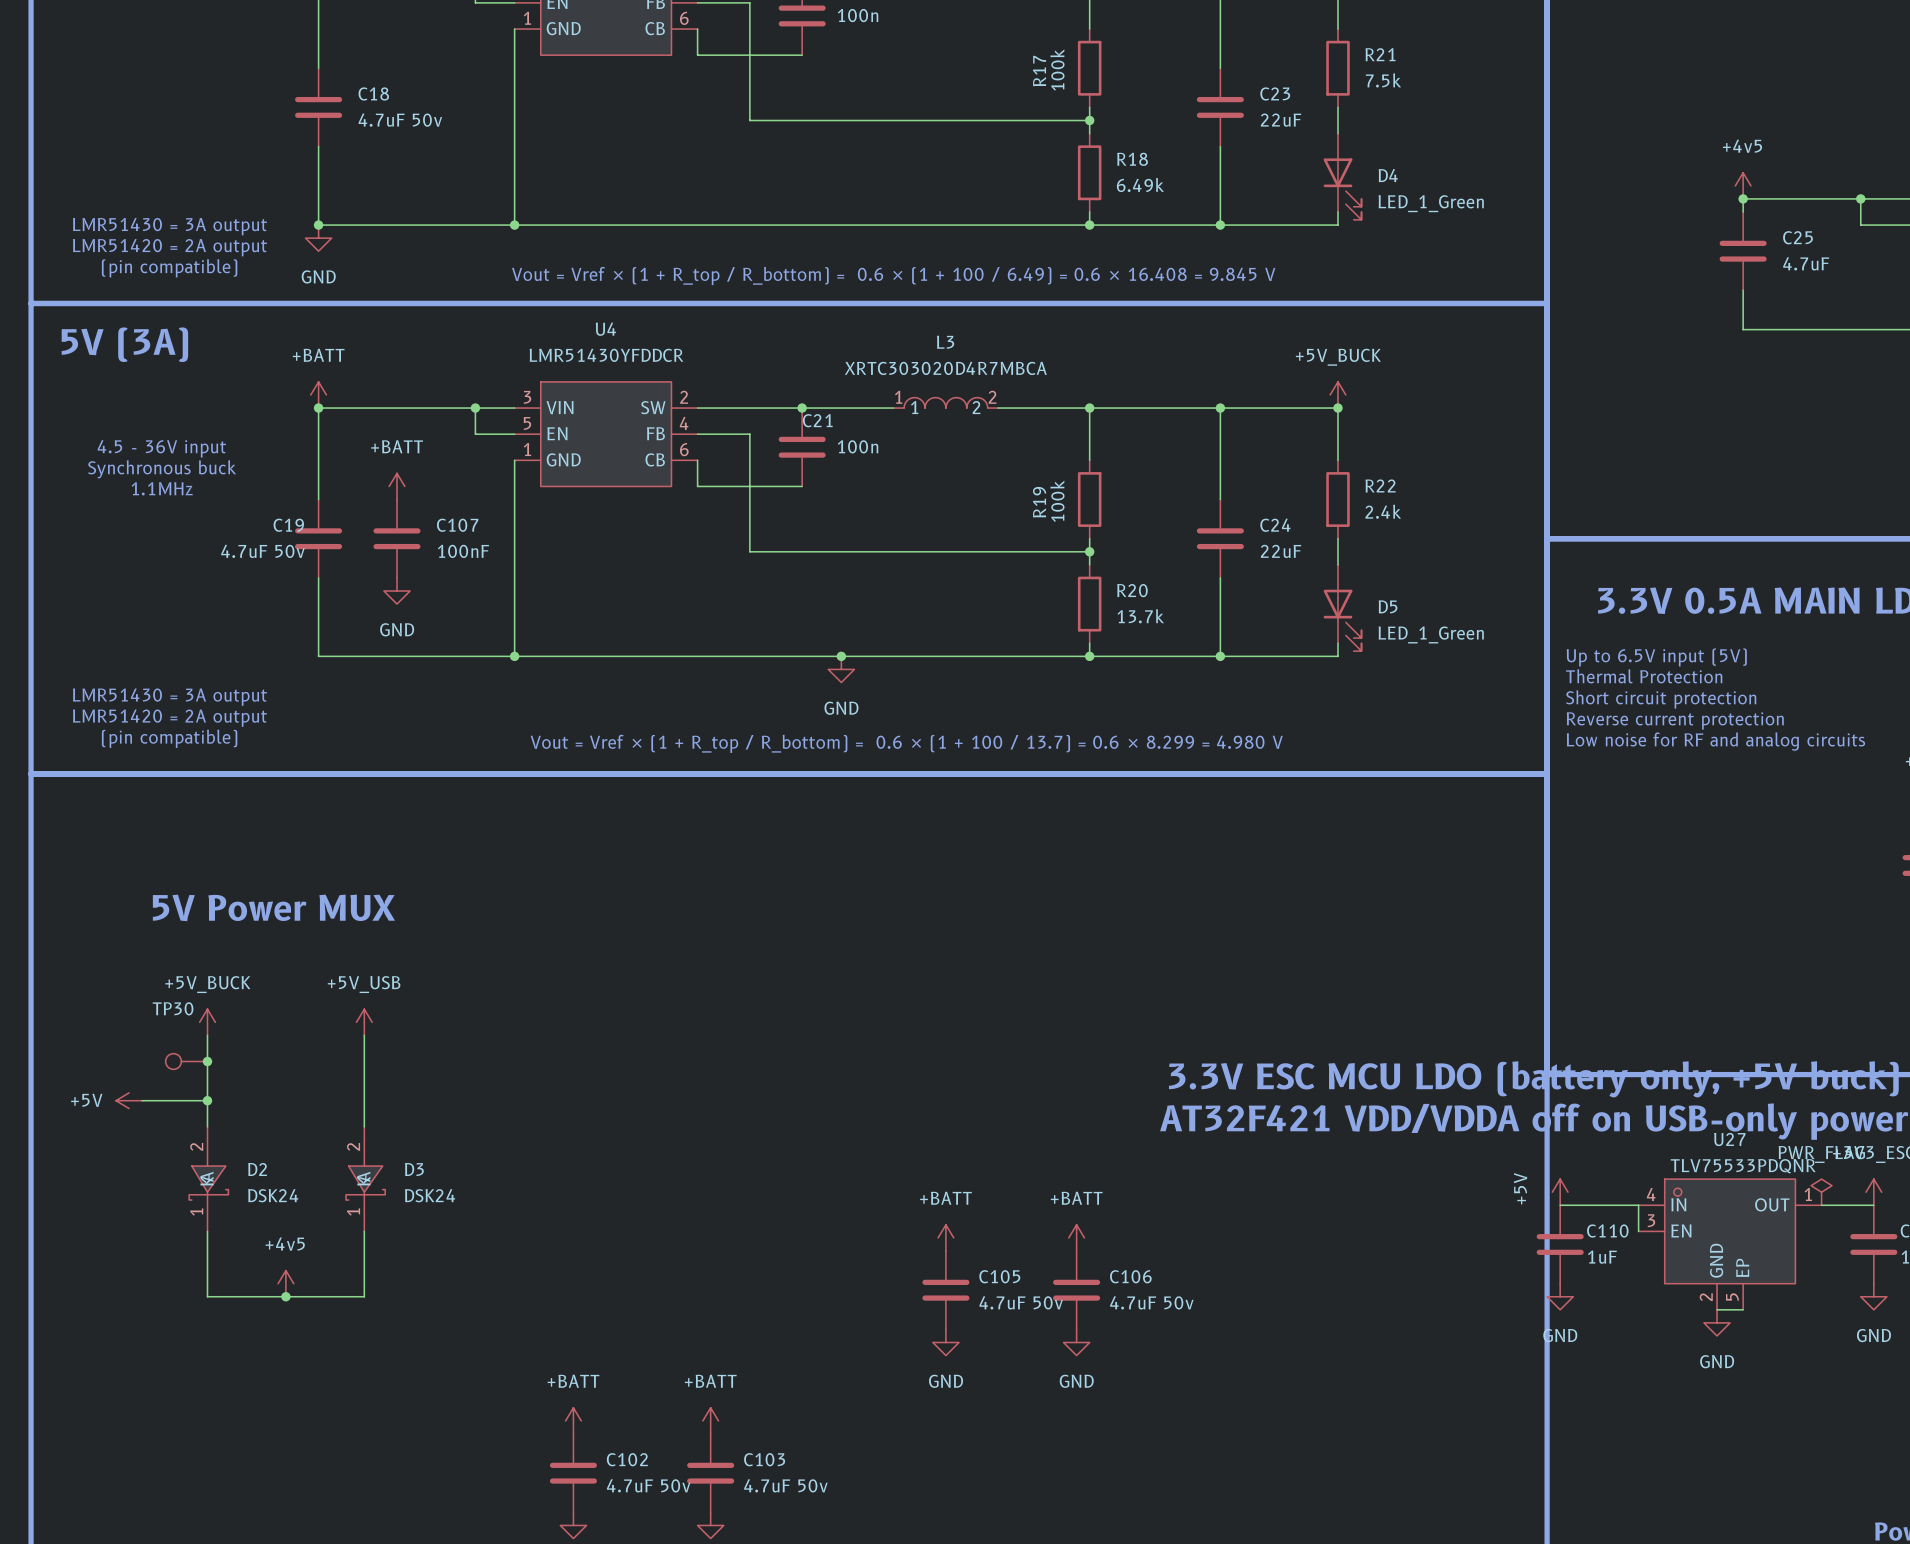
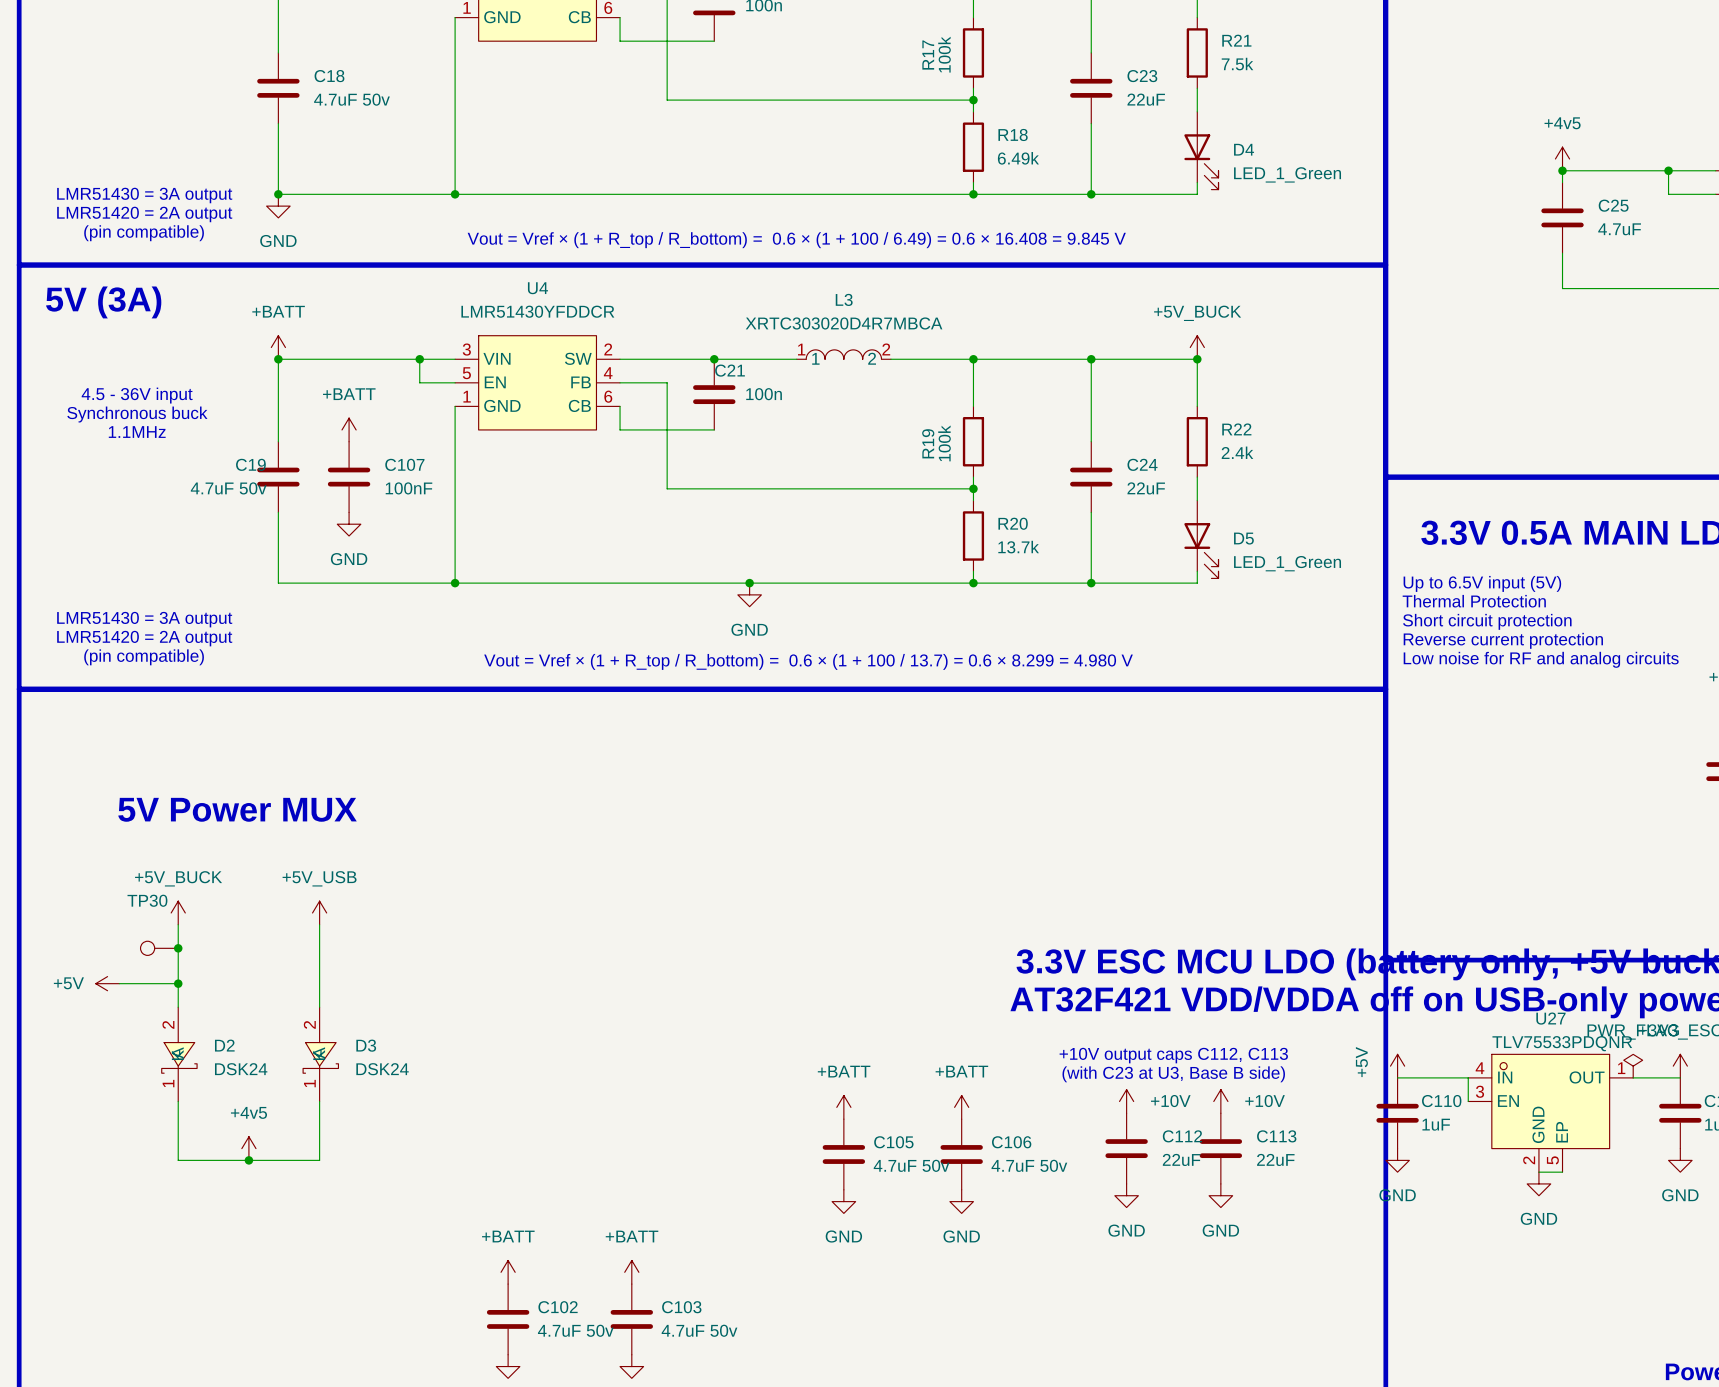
text: none -> +10V output caps C112, C113 (1173, 1055)
text: none -> (with C23 at U3, Base B side) (1173, 1074)
power symbol: none -> +10V (1126, 1101)
power symbol: none -> +10V (1220, 1101)
C112: none -> 22uF (1126, 1148)
C113: none -> 22uF (1220, 1148)
power symbol: none -> GND (1126, 1195)
power symbol: none -> GND (1220, 1195)

